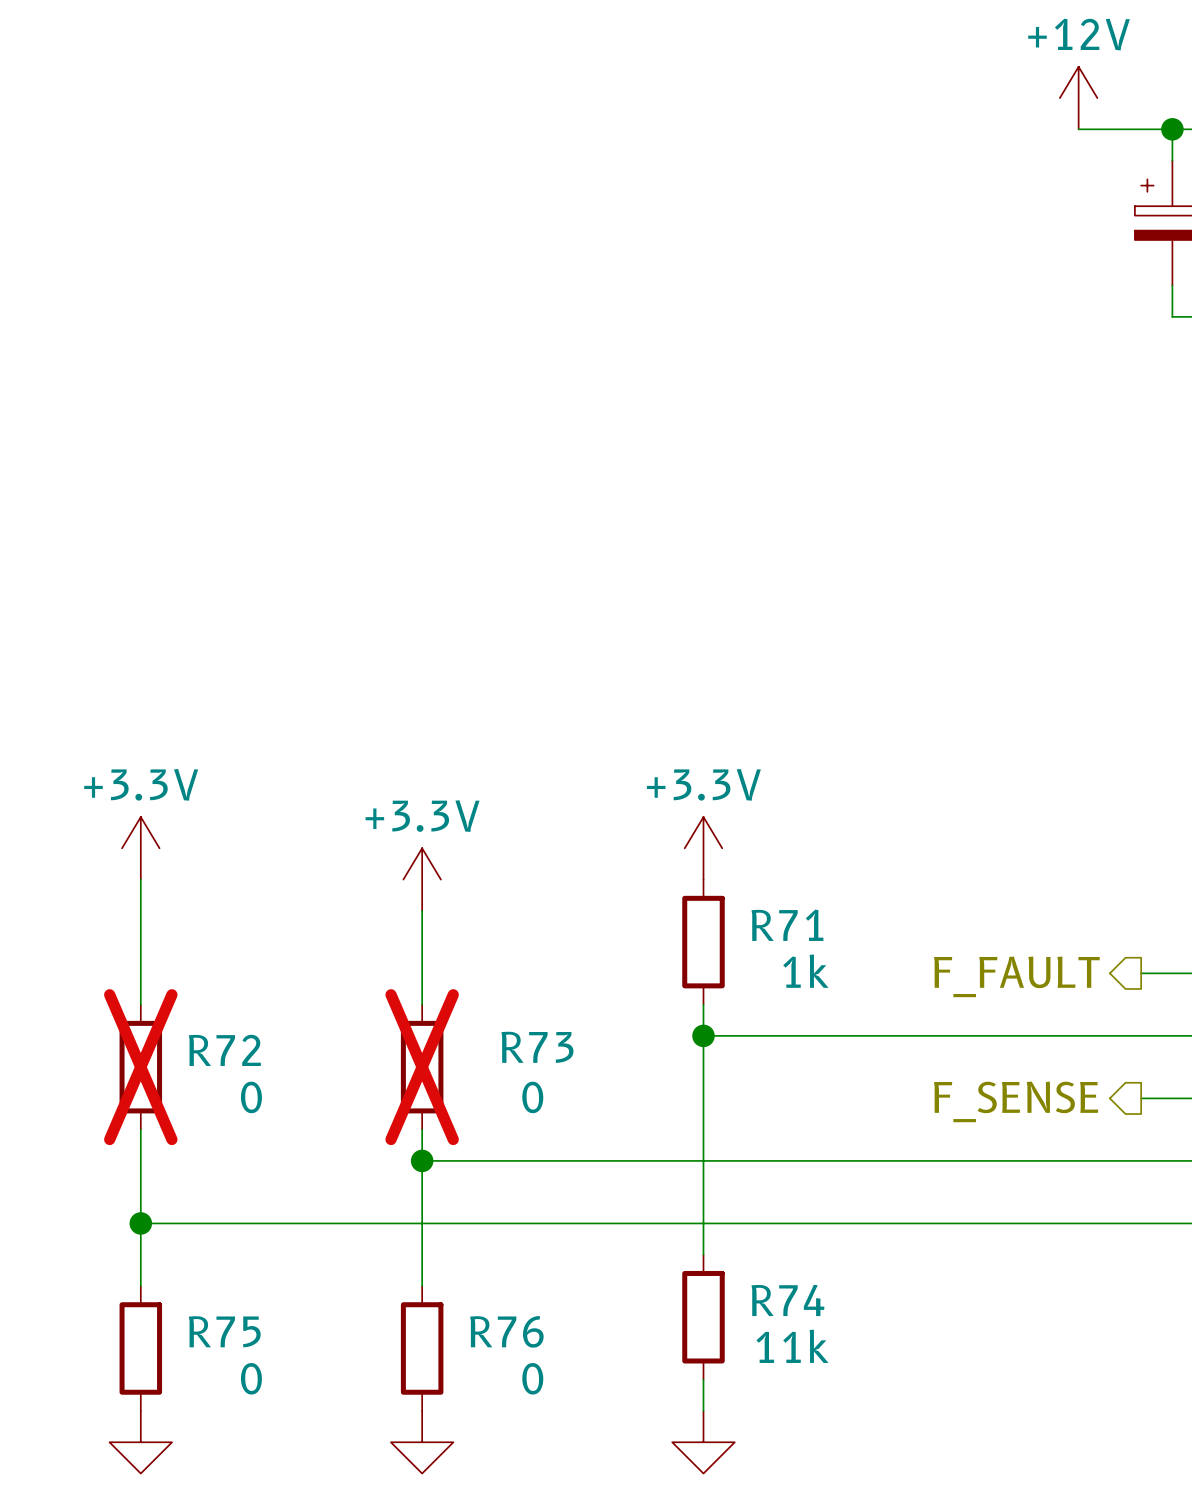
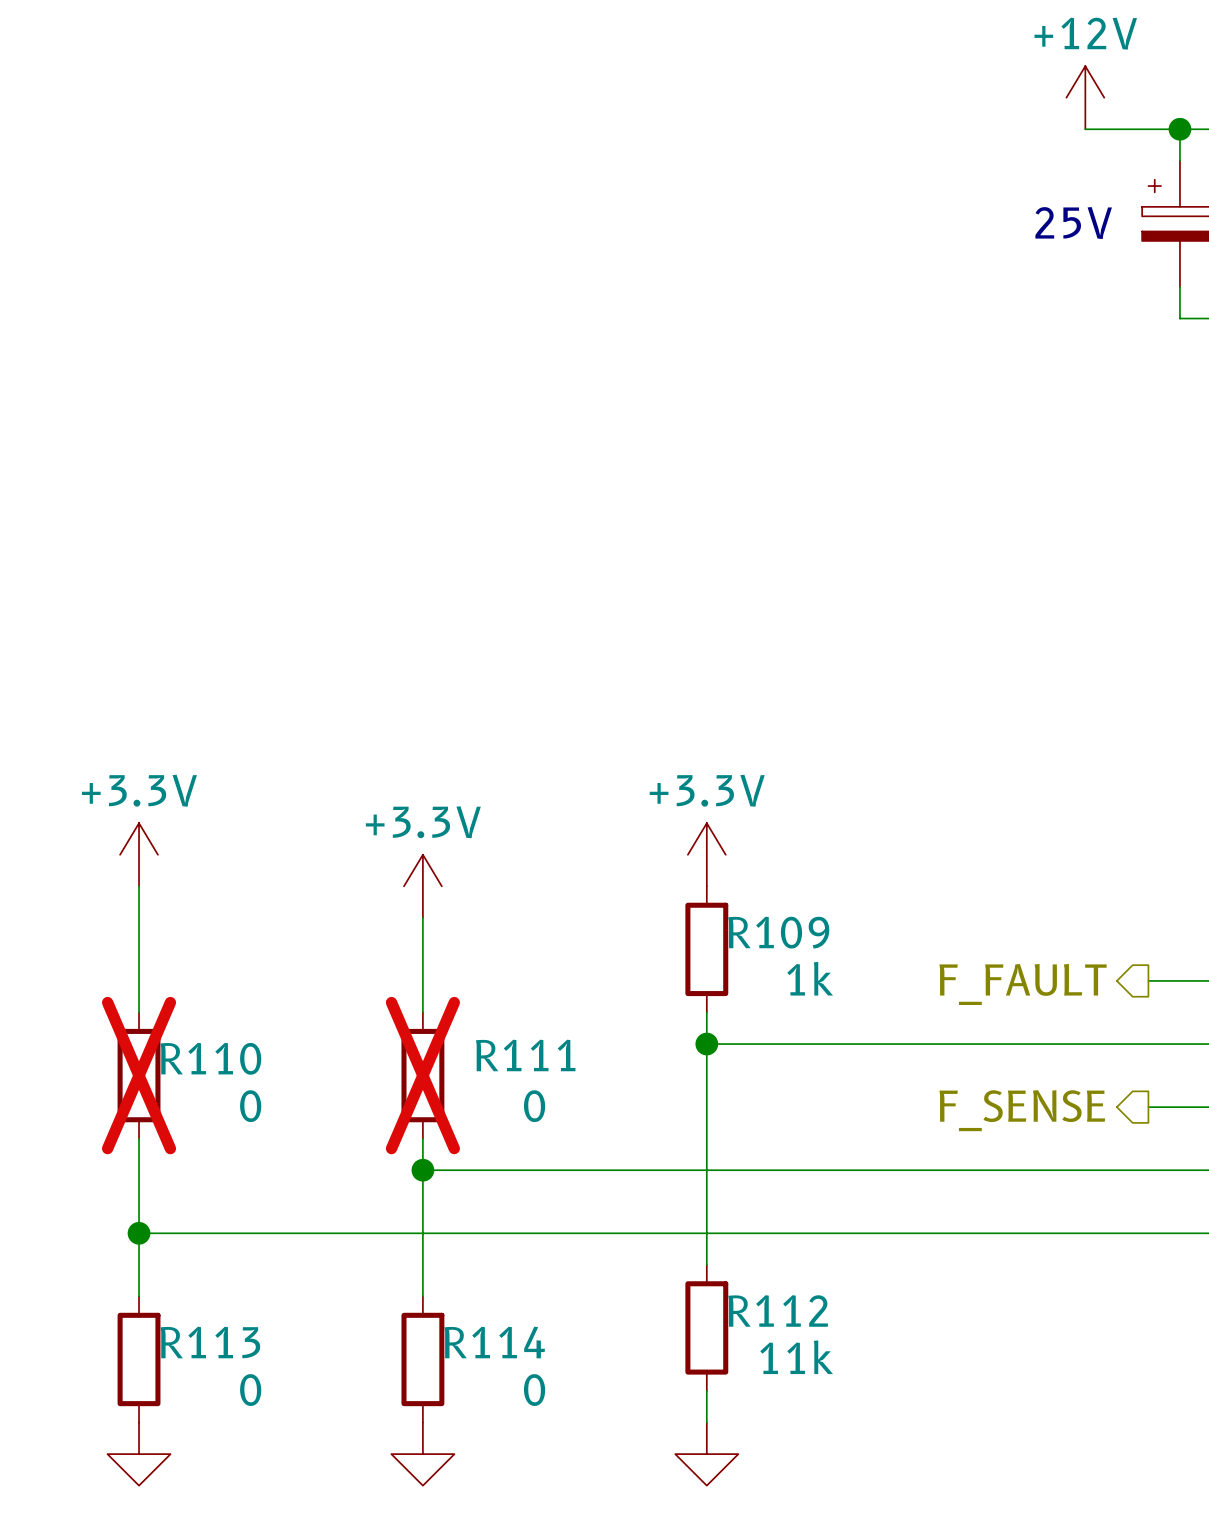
text: none -> 25V (1073, 223)
R71 name: R71 (787, 925) -> R109 (778, 932)
R73 name: R73 (537, 1047) -> R111 (525, 1055)
R72 name: R72 (224, 1050) -> R110 (210, 1058)
R74 name: R74 (787, 1300) -> R112 (778, 1310)
R75 name: R75 (224, 1331) -> R113 (210, 1342)
R76 name: R76 (506, 1331) -> R114 (494, 1342)

